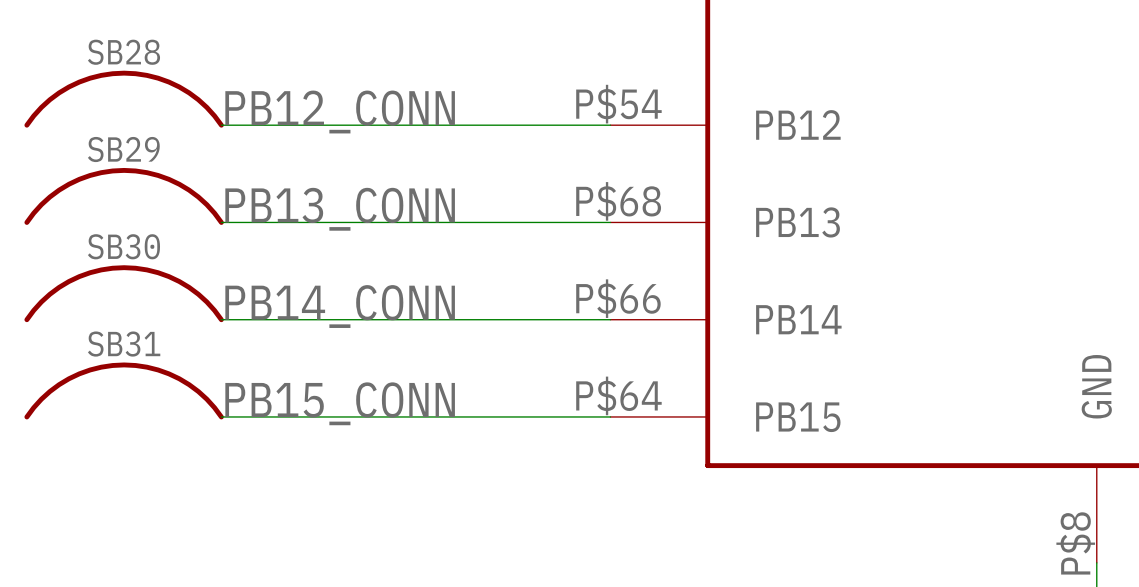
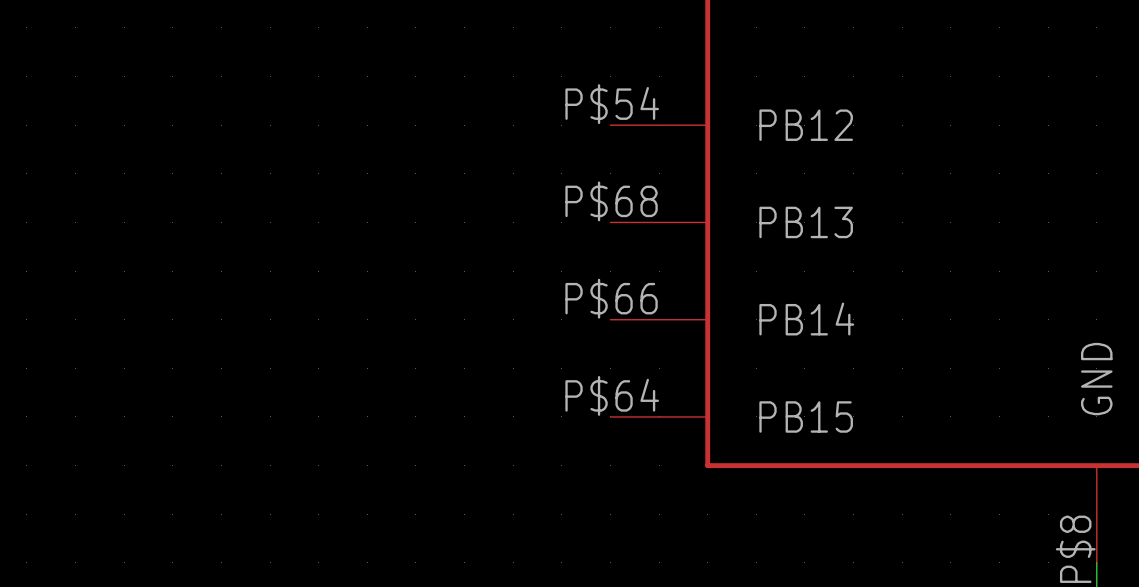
SB28: (124, 99) -> none
label: PB12_CONN (340, 112) -> none
wire: (221, 125) (610, 125) -> none
SB29: (124, 196) -> none
label: PB13_CONN (340, 209) -> none
wire: (221, 222) (610, 222) -> none
SB30: (124, 293) -> none
label: PB14_CONN (340, 306) -> none
wire: (221, 319) (610, 319) -> none
SB31: (124, 390) -> none
label: PB15_CONN (340, 403) -> none
wire: (221, 416) (610, 416) -> none

